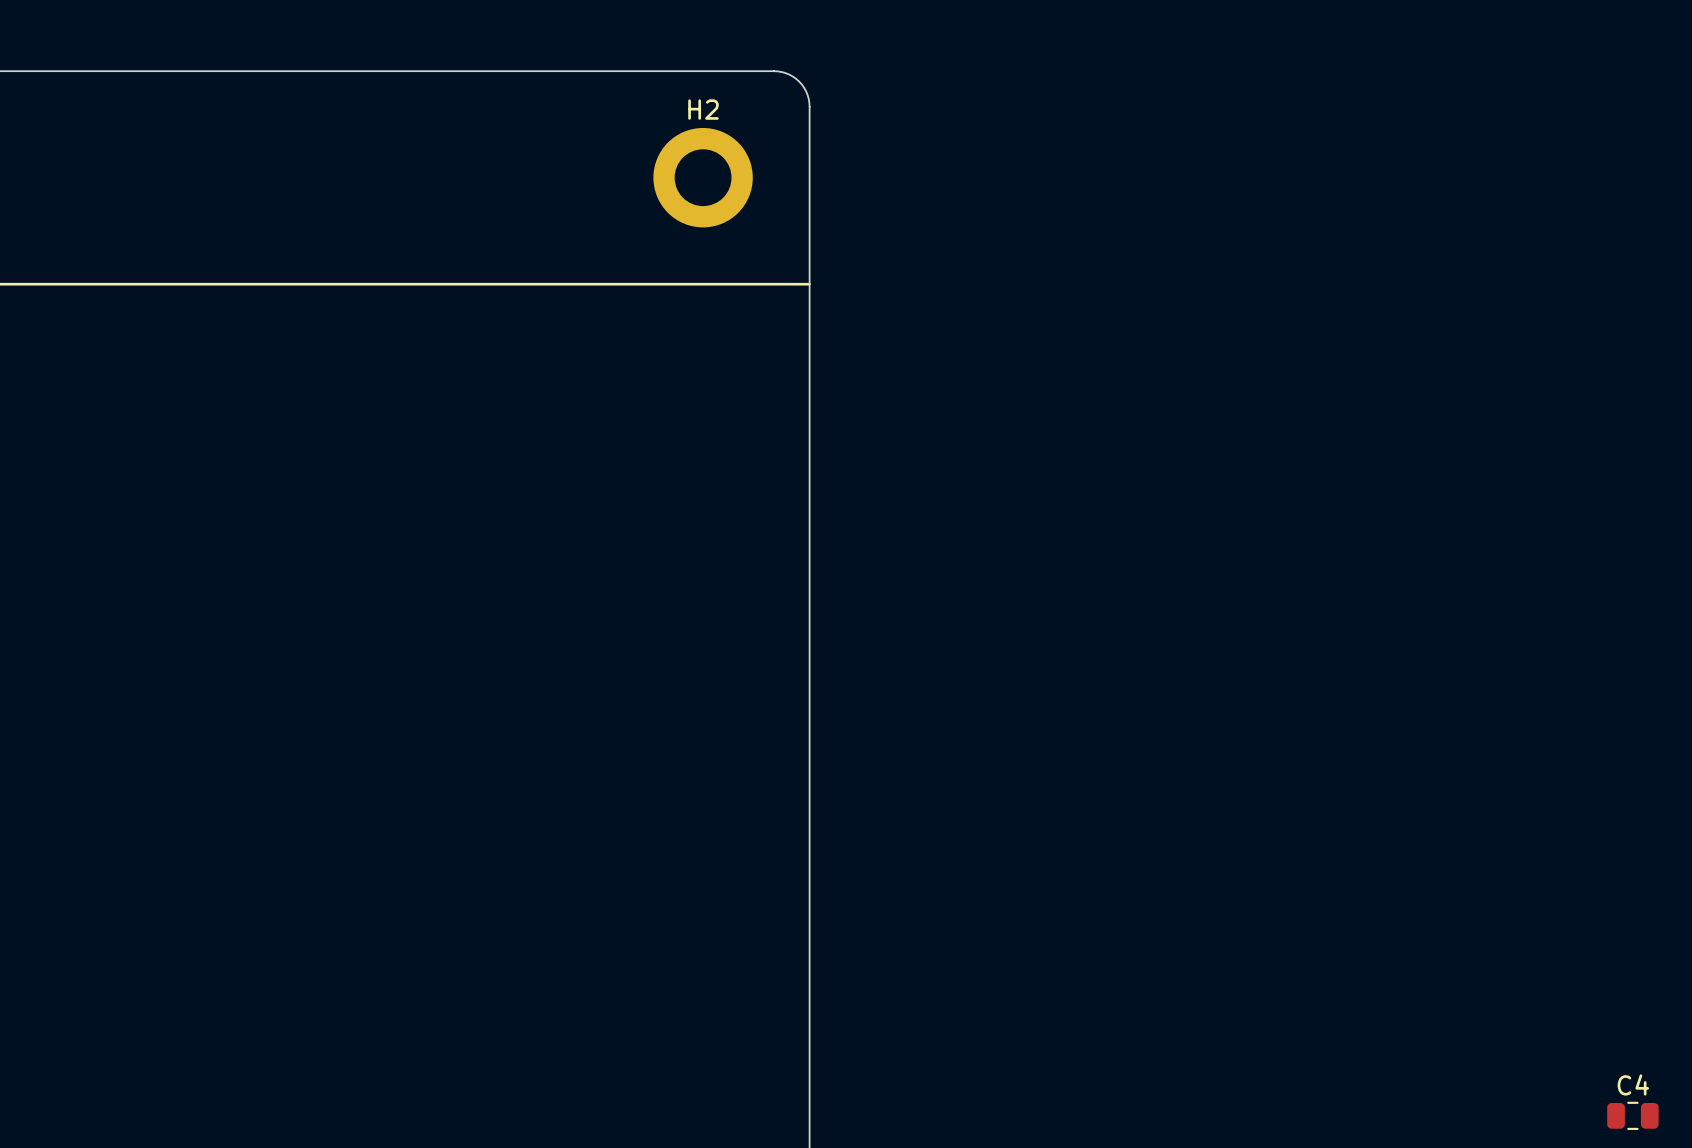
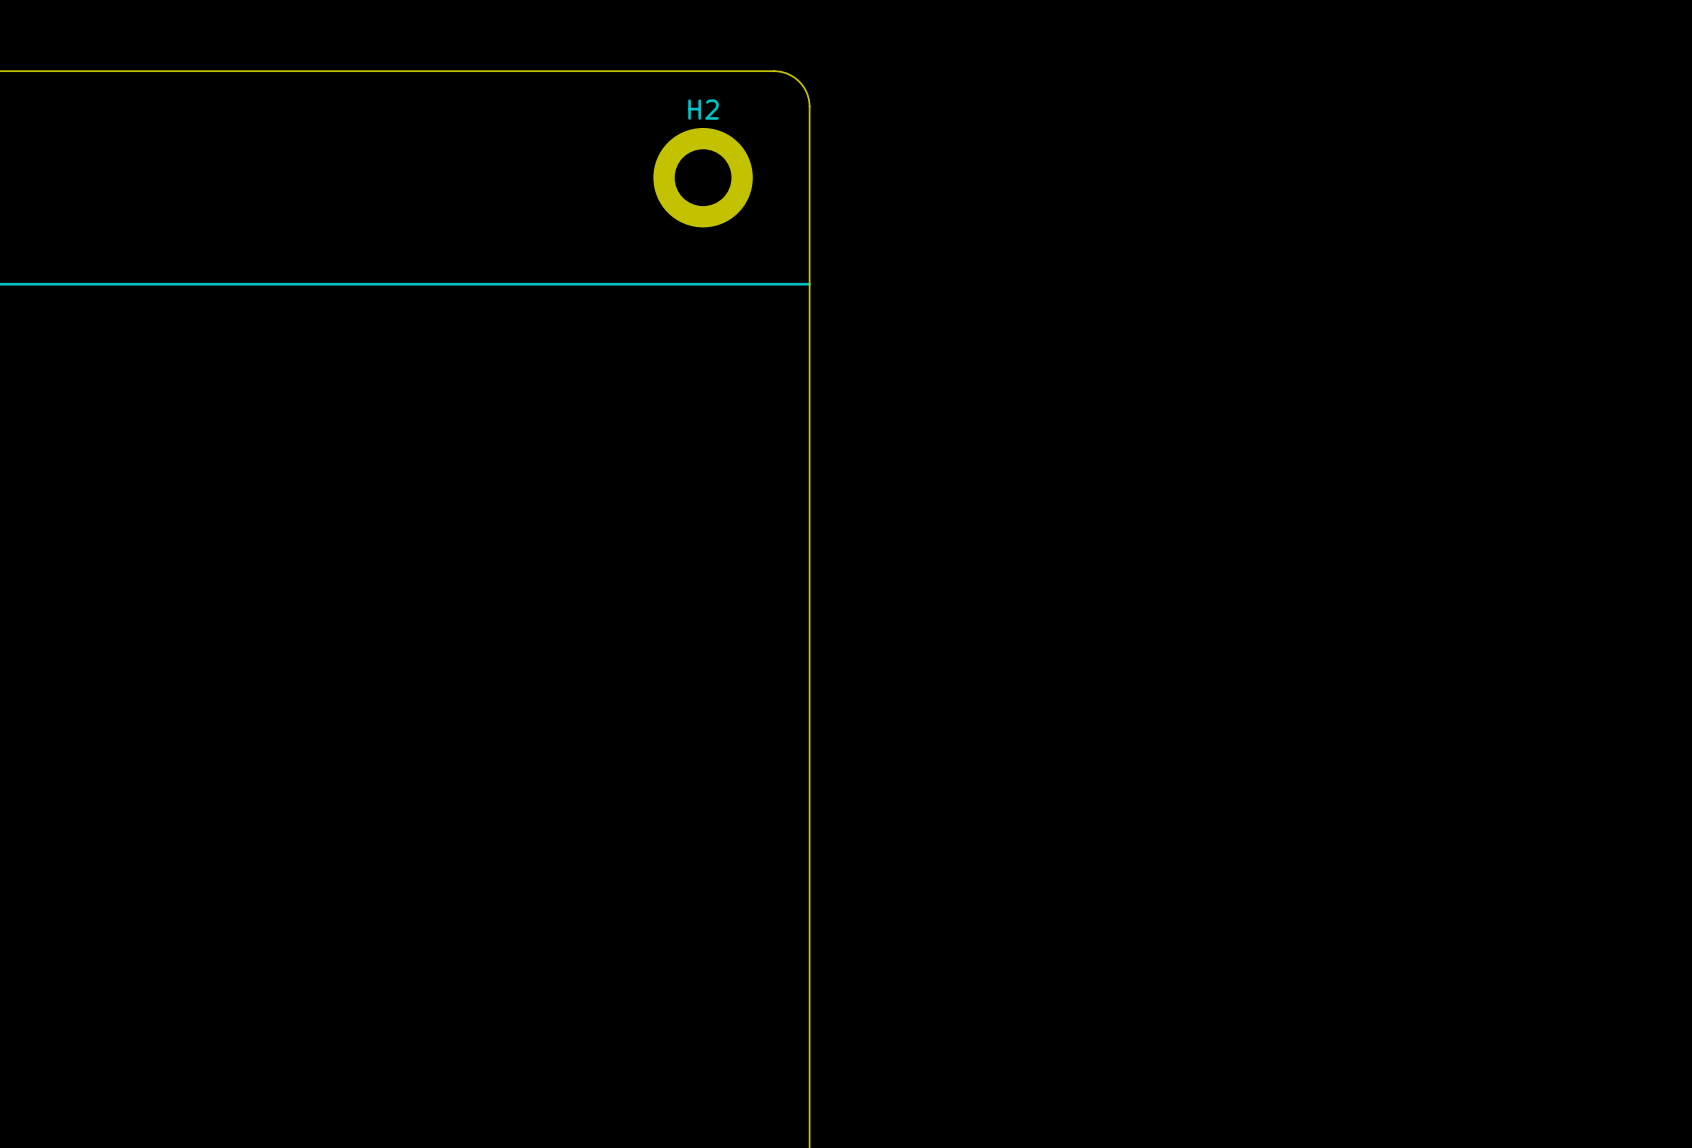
C4: (1632, 1115) -> none

